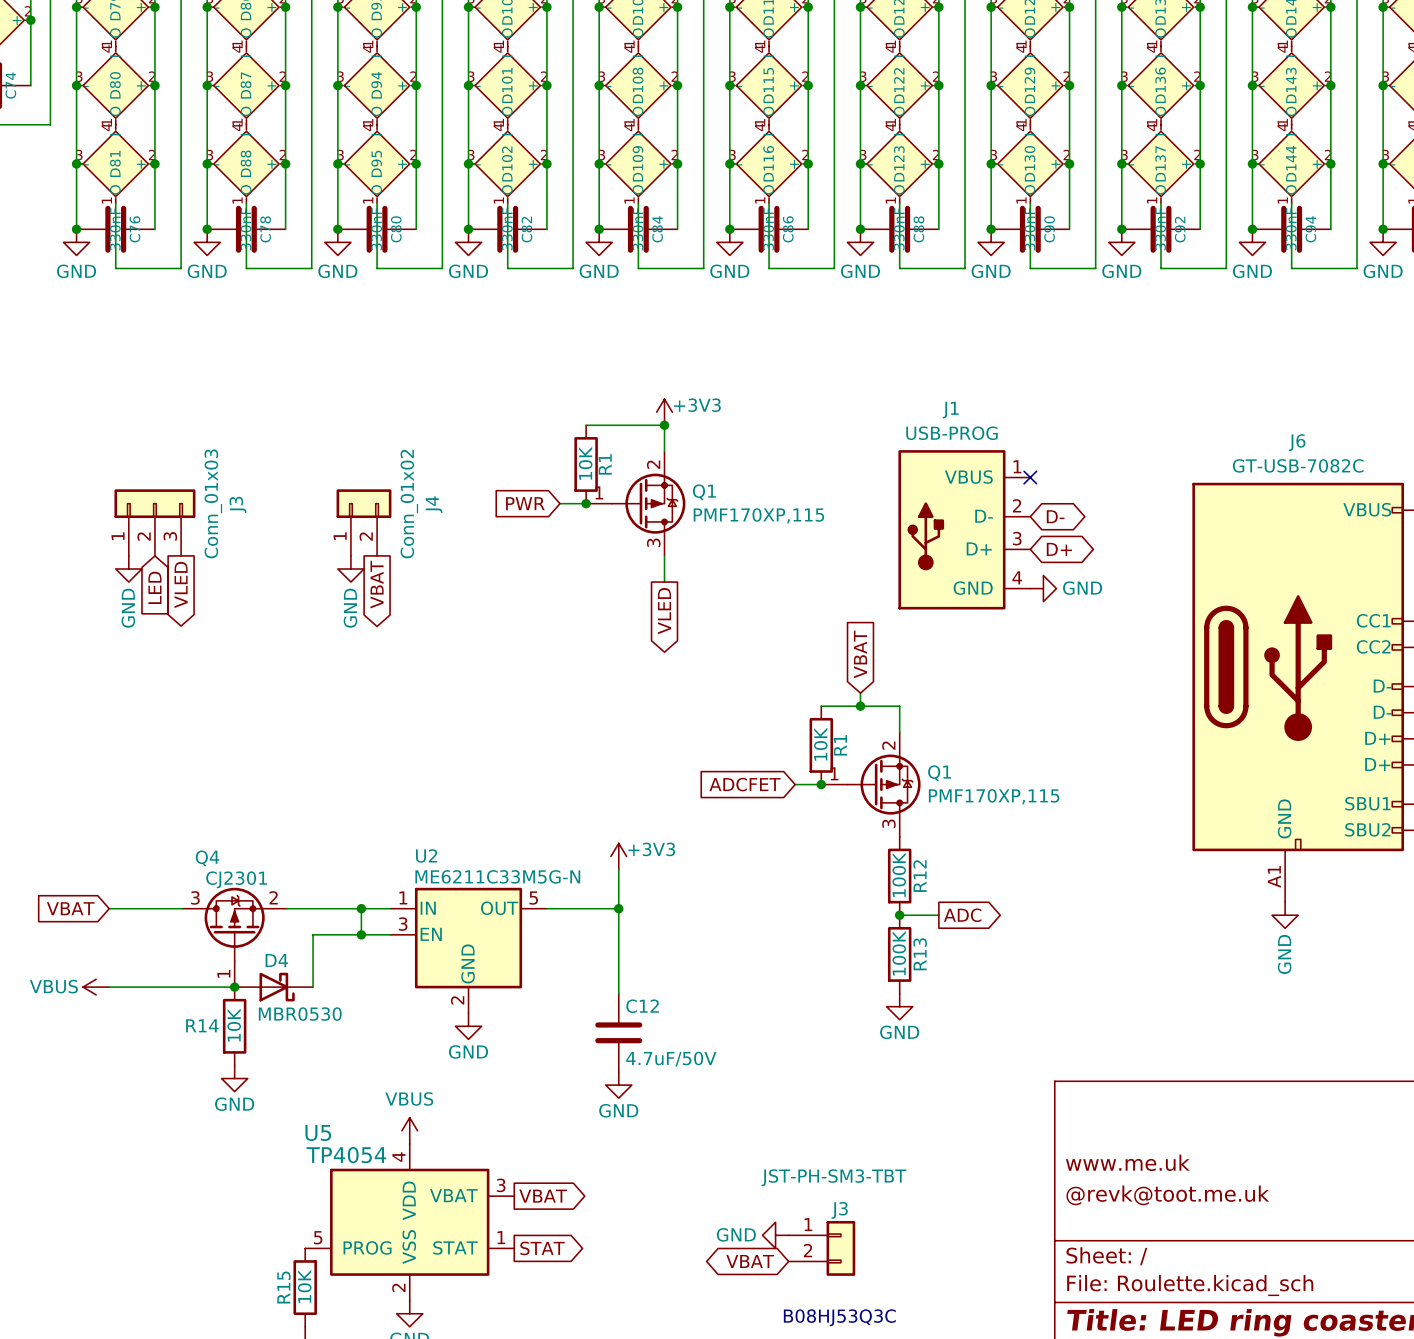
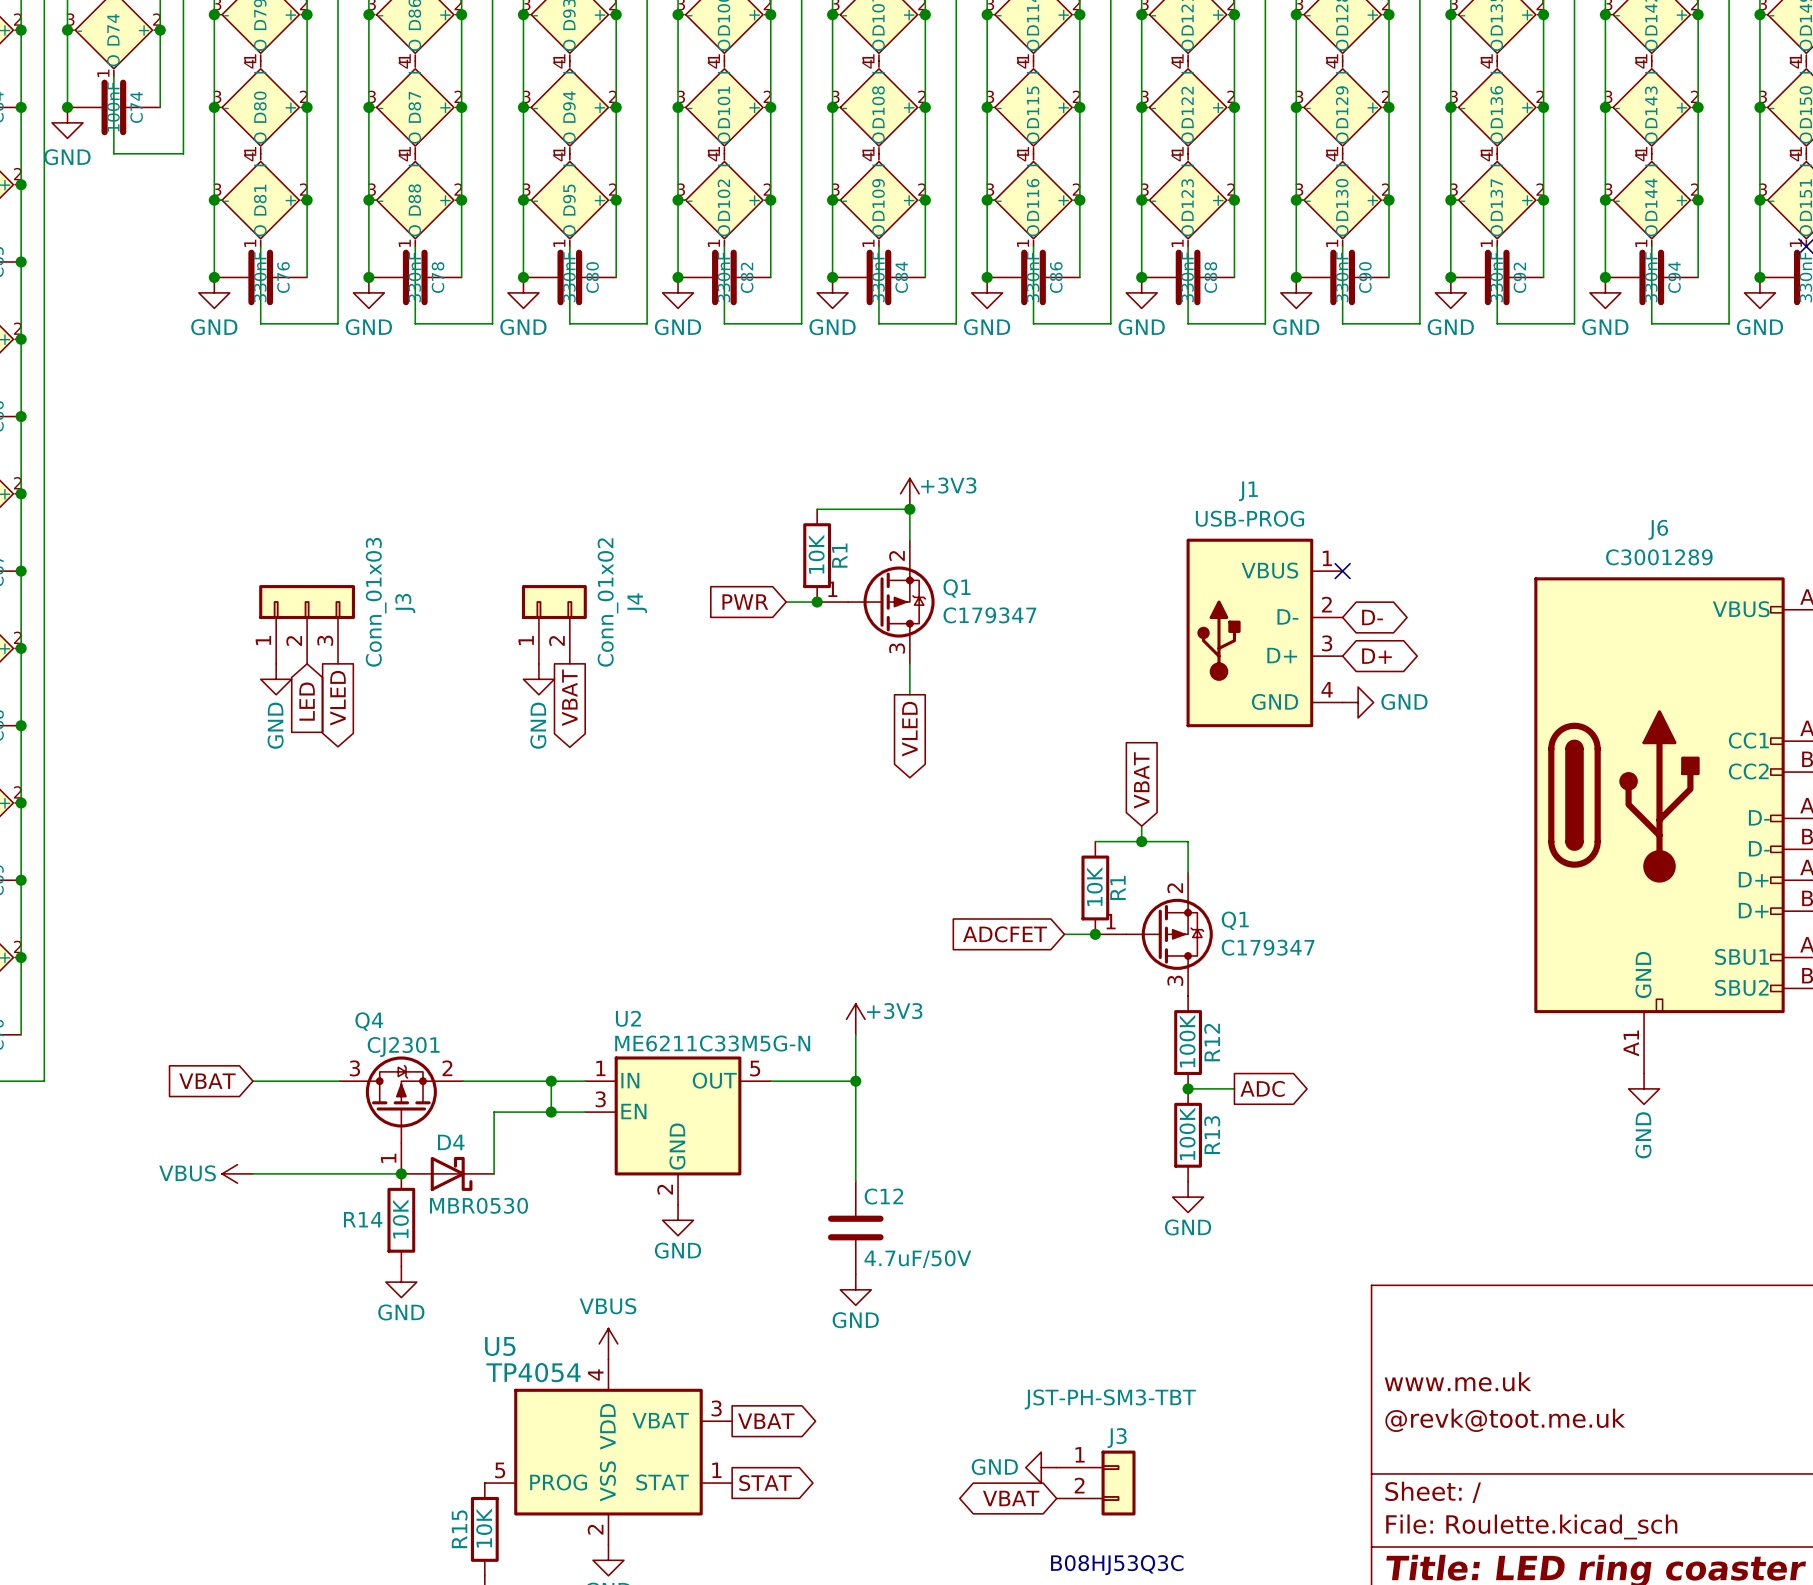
J6 value: GT-USB-7082C (1298, 465) -> C3001289 (1659, 557)
Q1 value: PMF170XP,115 (758, 515) -> C179347 (989, 615)
Q1 value: PMF170XP,115 (994, 796) -> C179347 (1268, 947)

